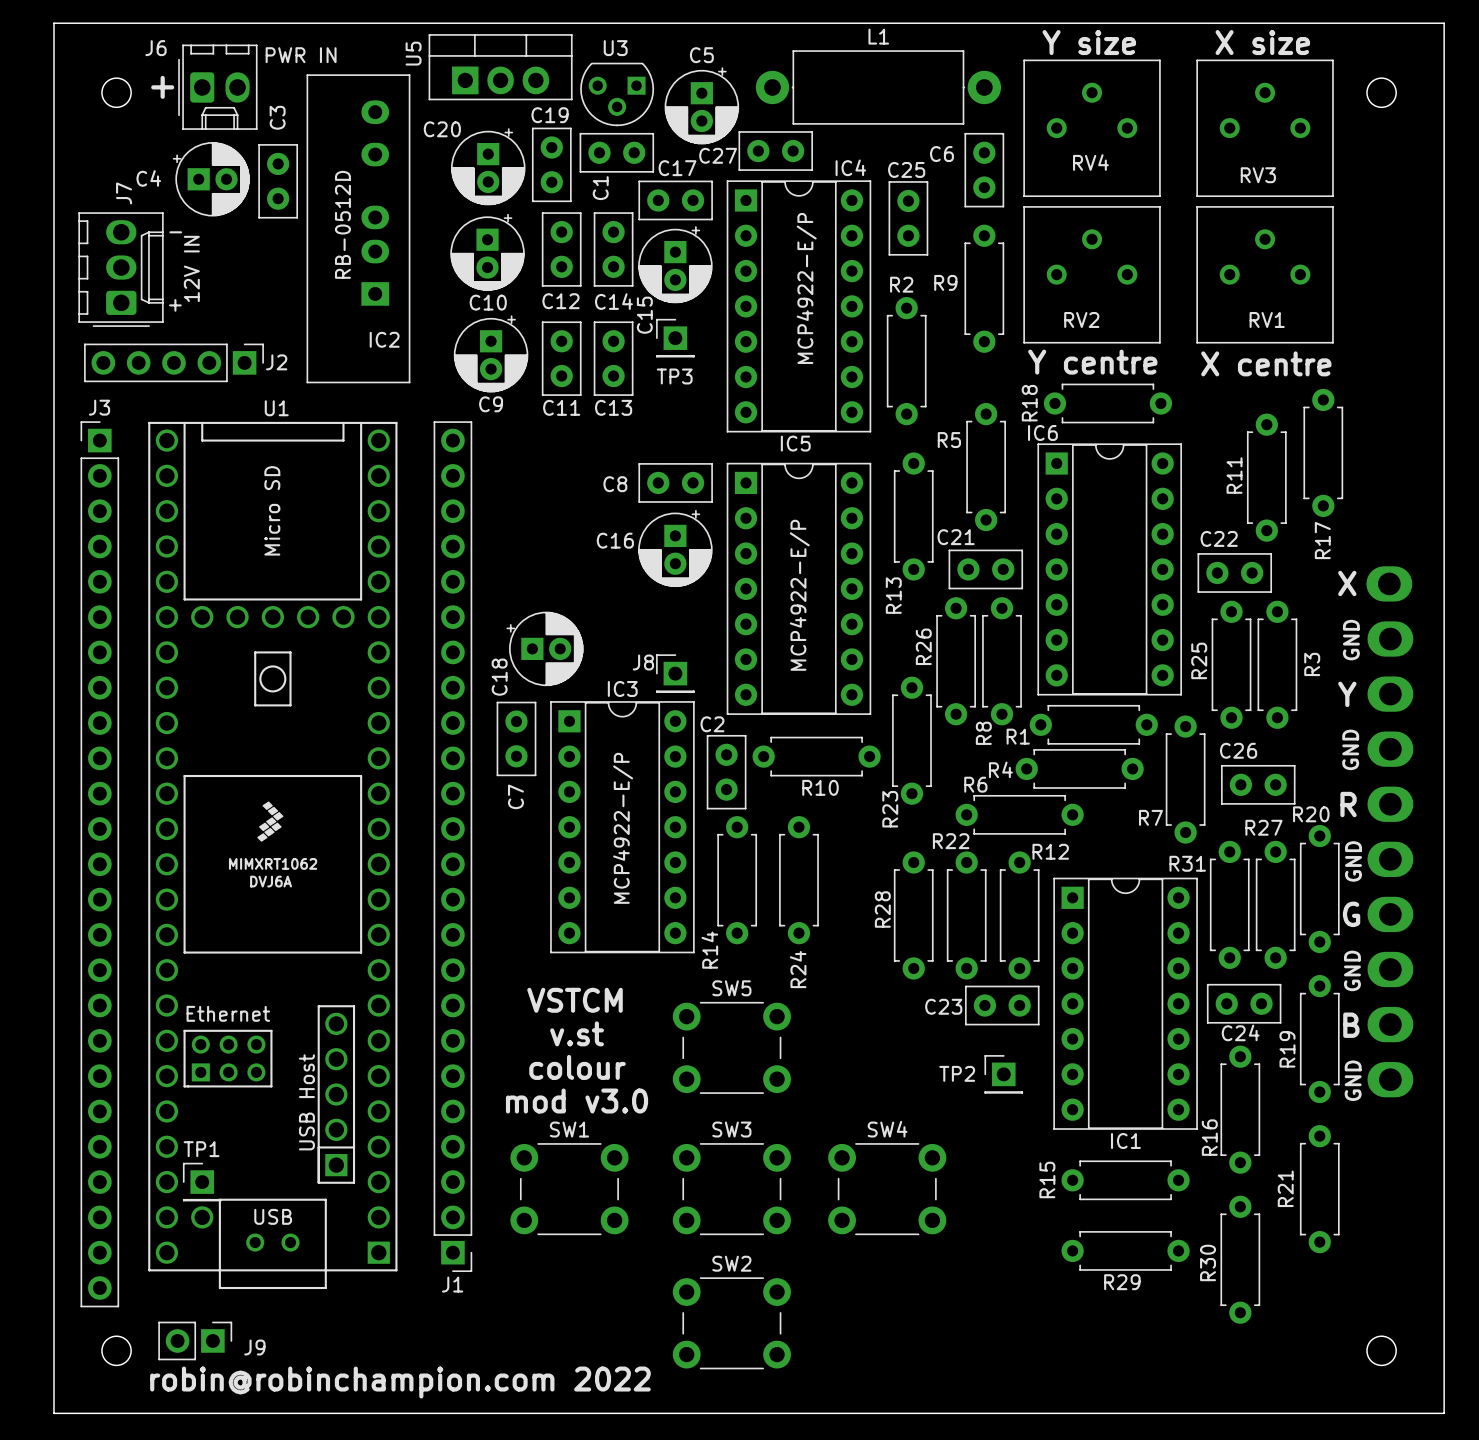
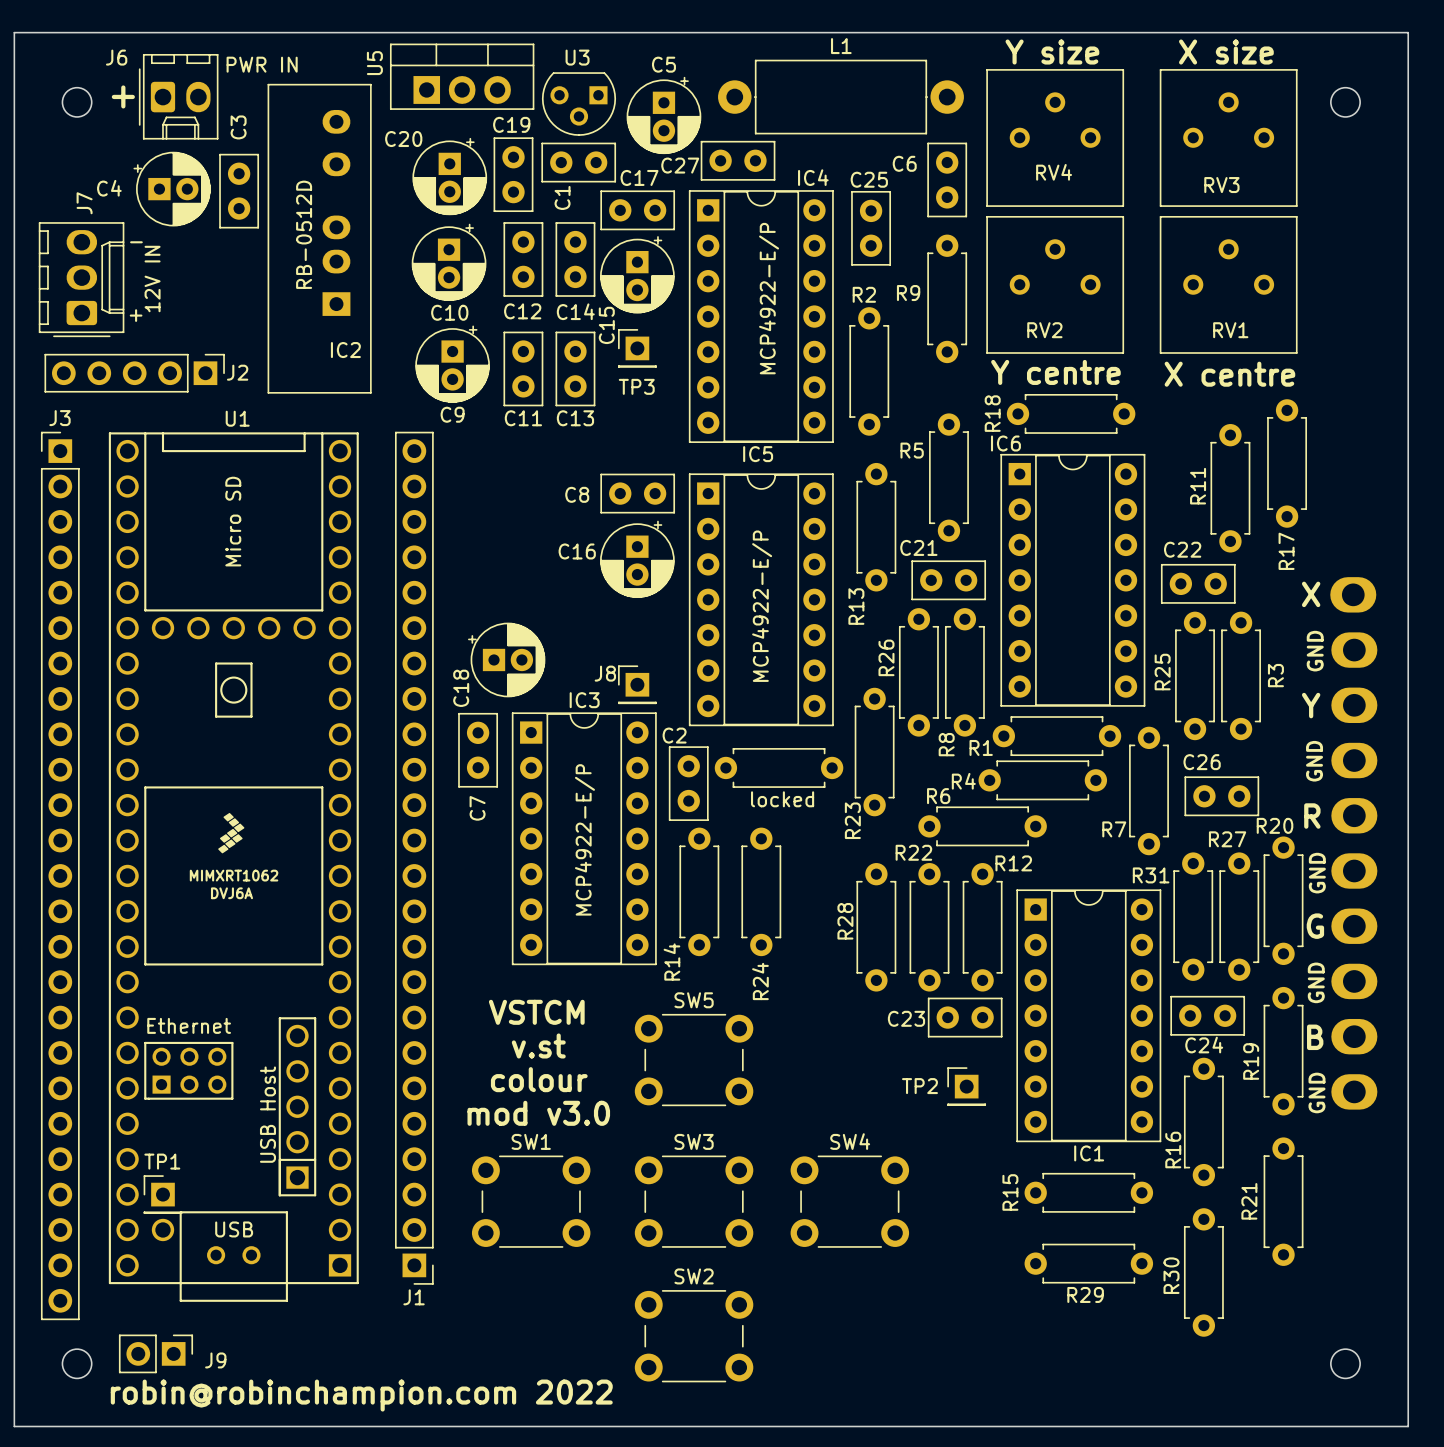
R10 name: R10 (820, 787) -> locked (782, 799)

